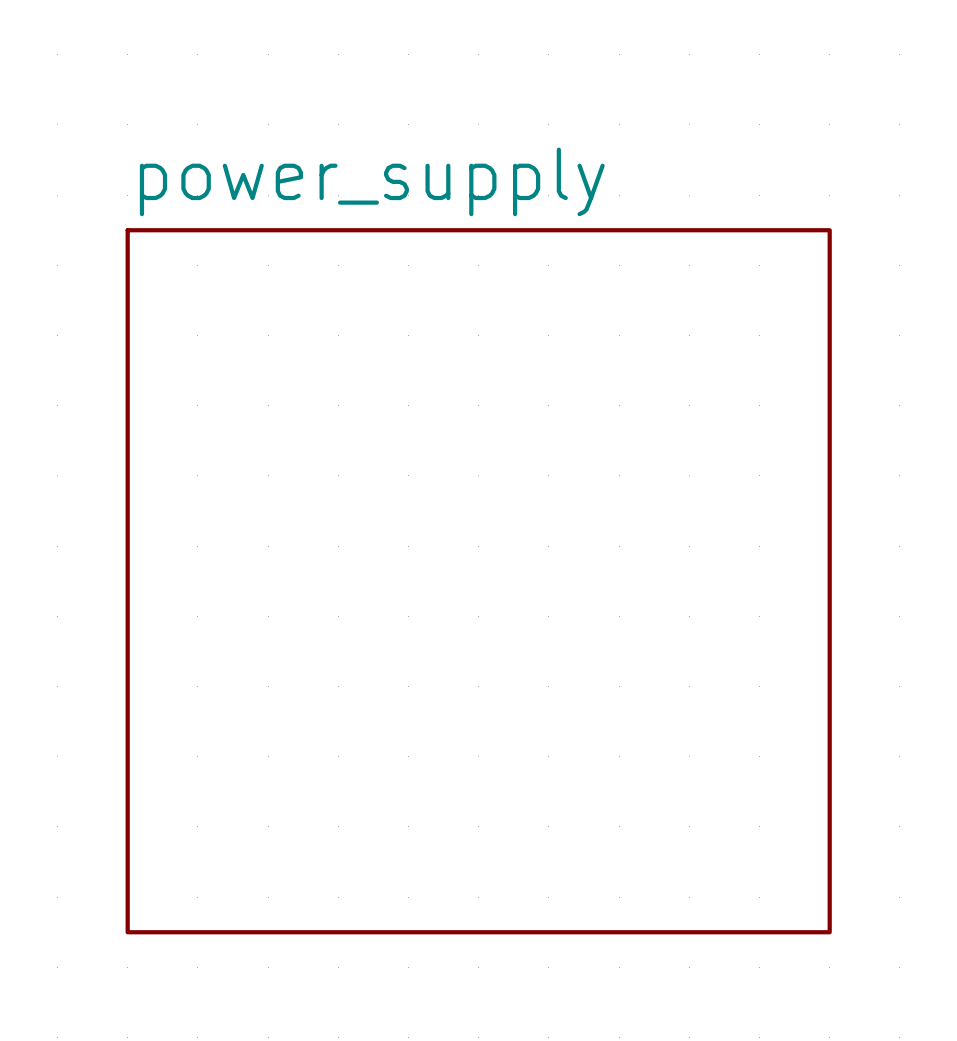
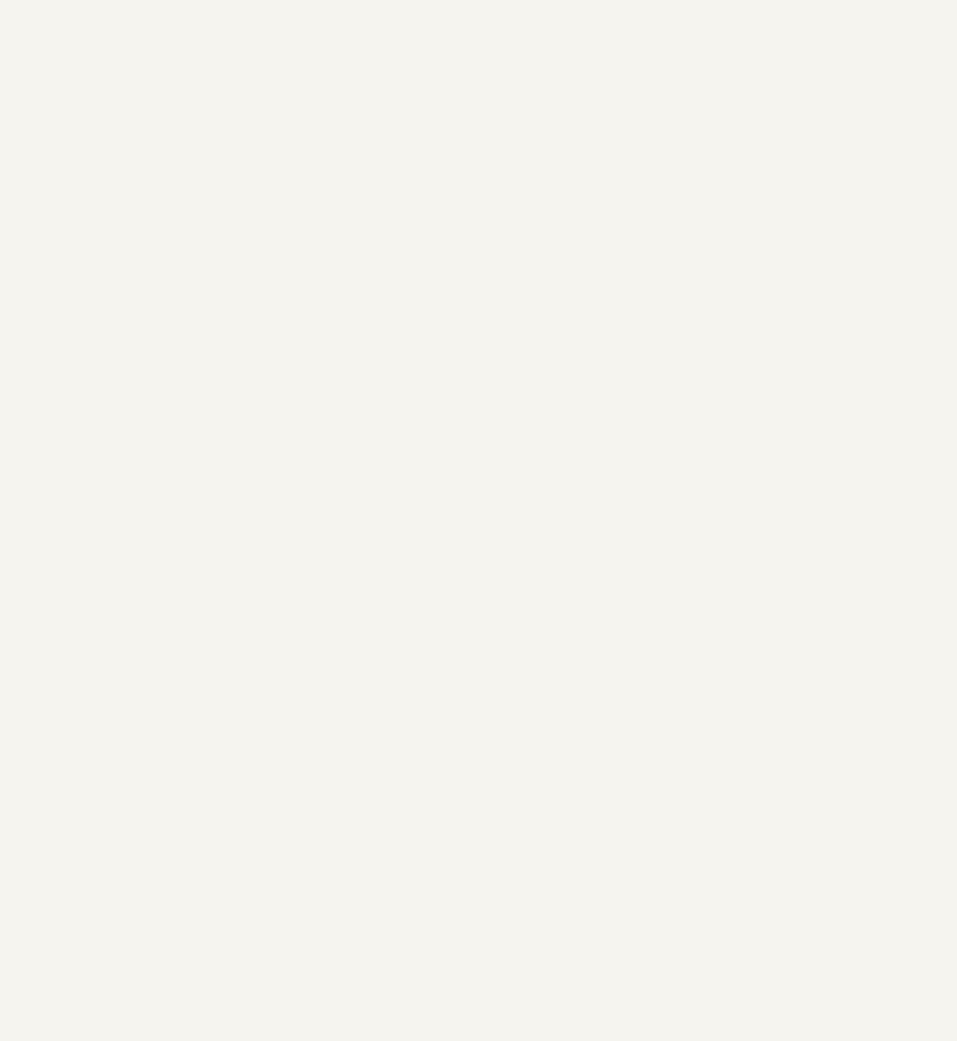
sheet power_supply: (478, 581) -> none

